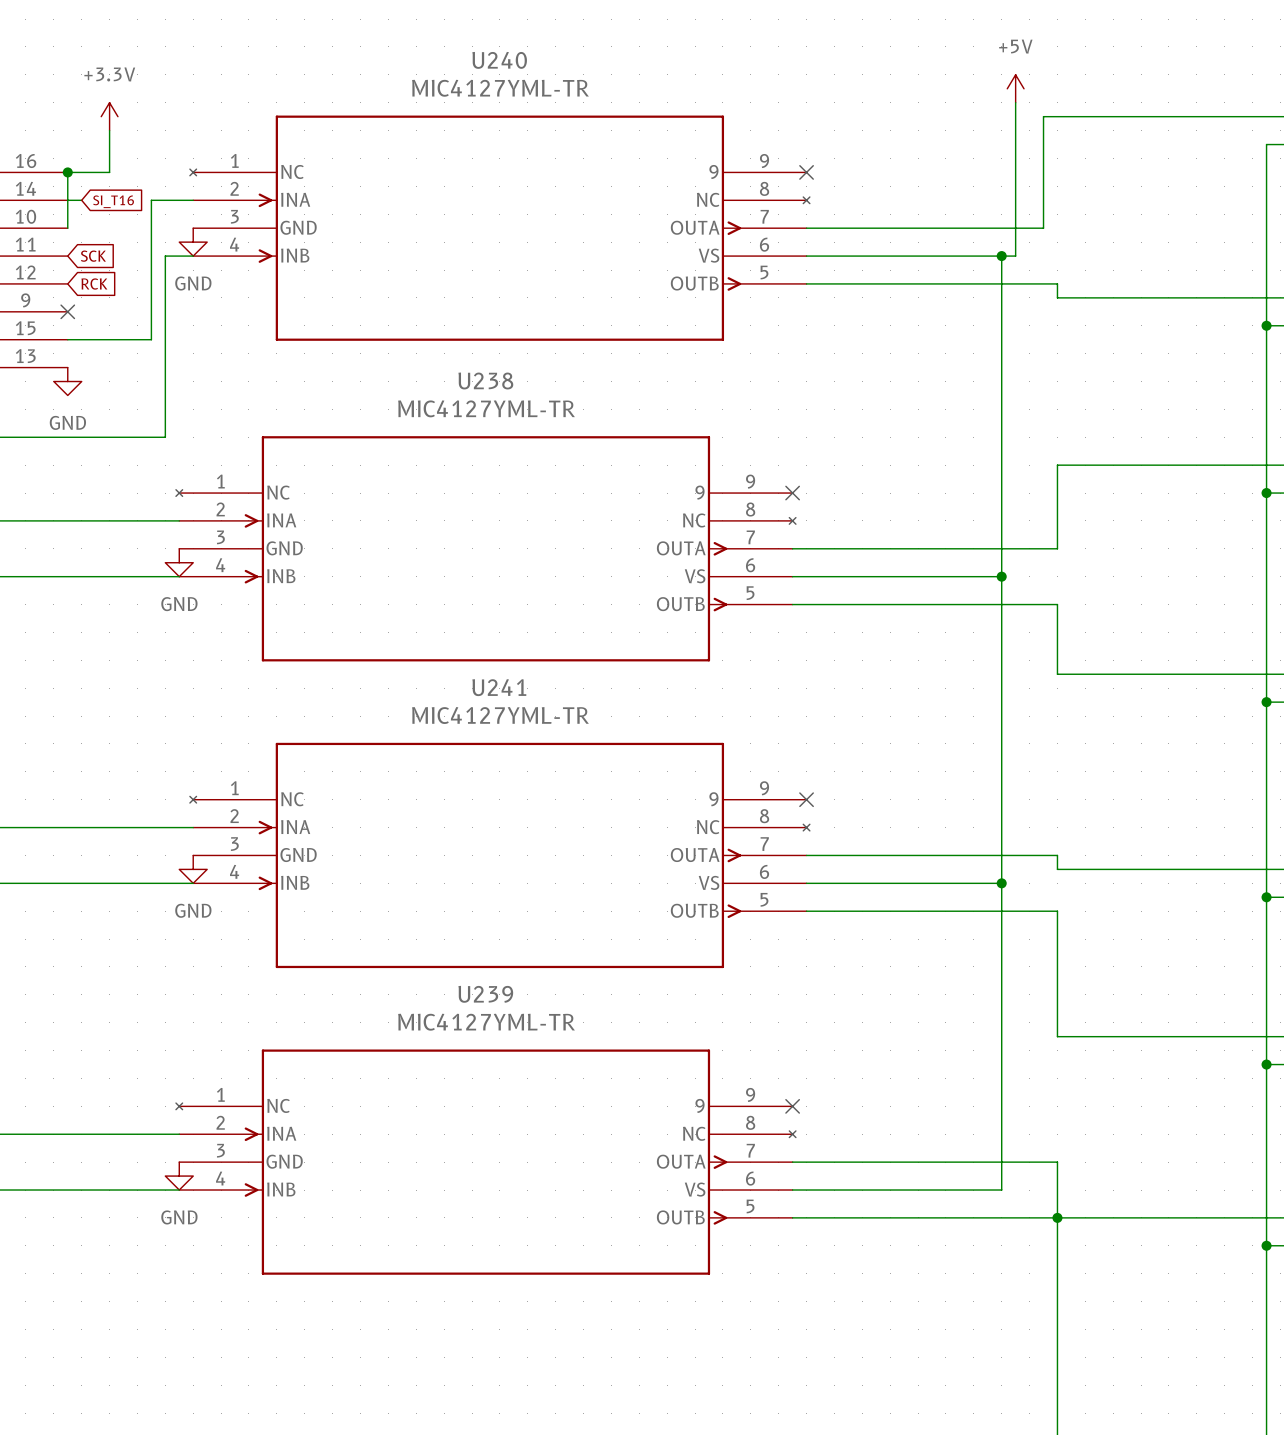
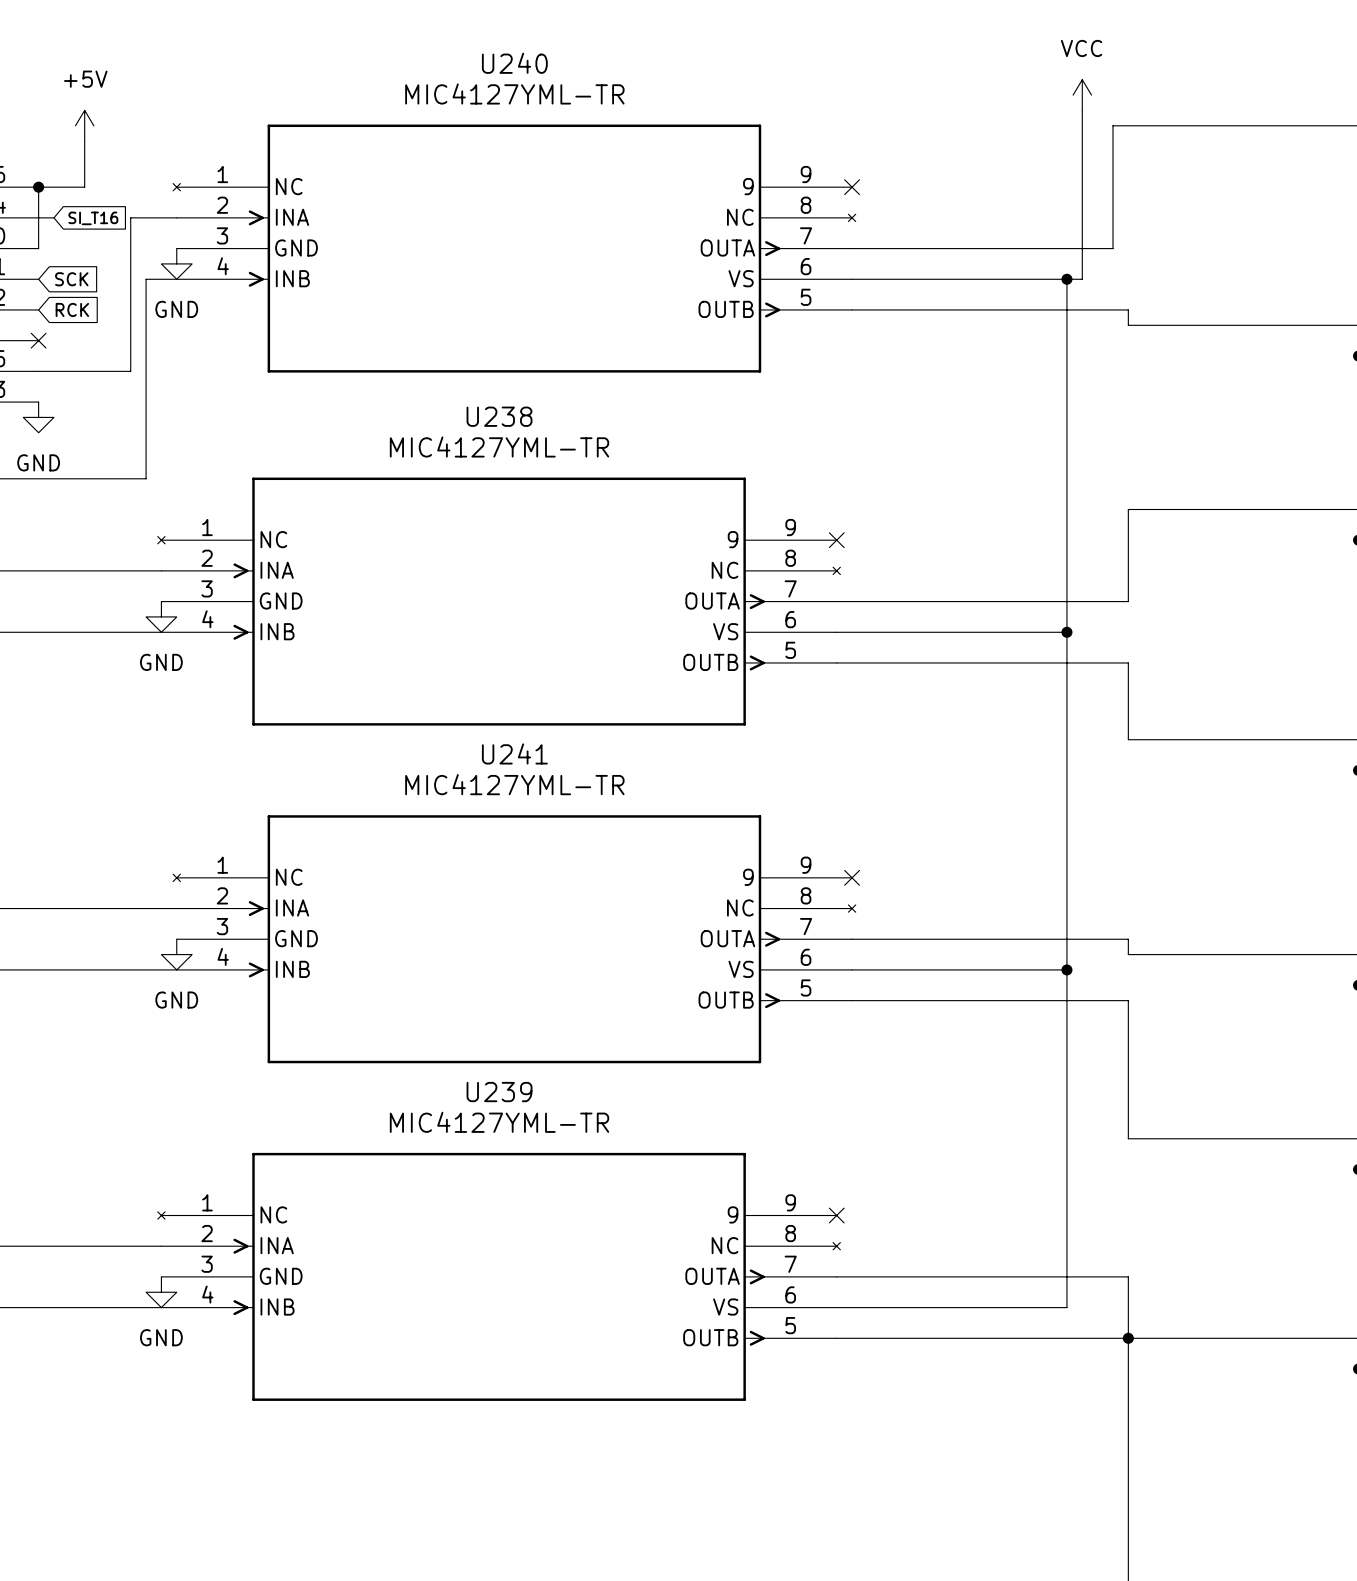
power symbol: +5V (1015, 88) -> VCC (1082, 95)
power symbol: +3.3V (109, 116) -> +5V (84, 125)

